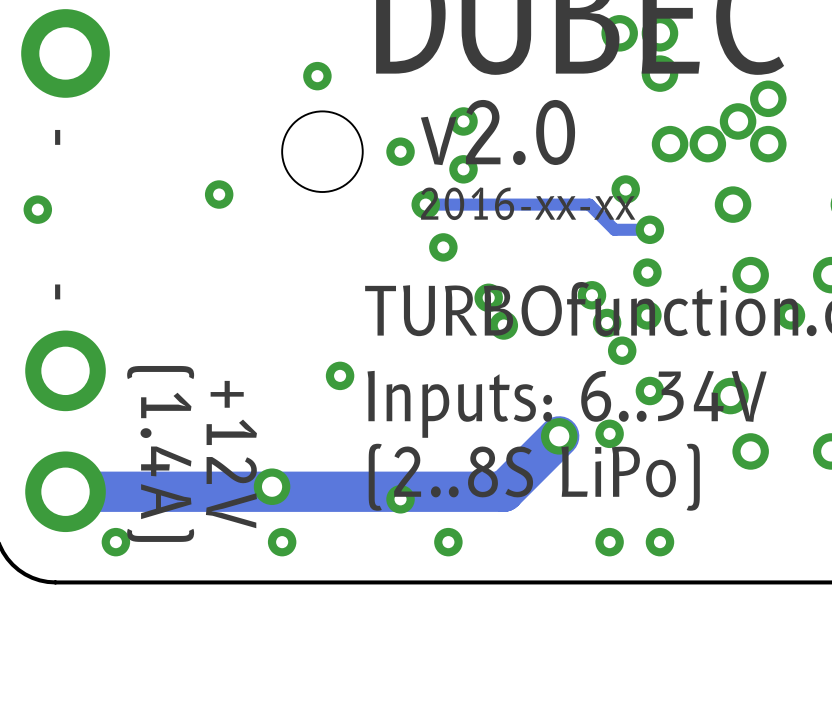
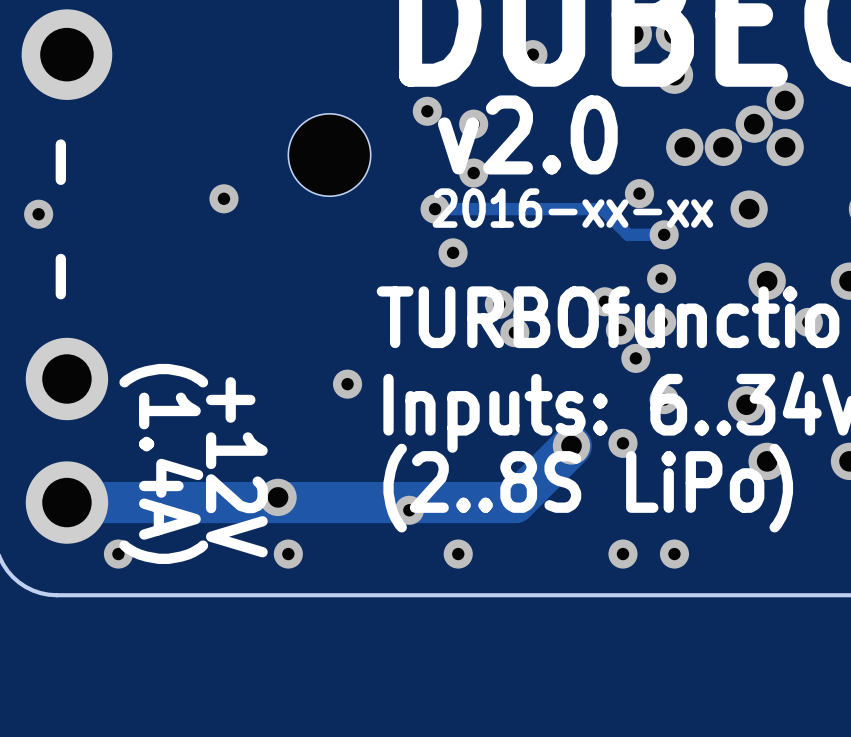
via: none -> (532, 54)
via: (317, 76) -> none
via position: (400, 151) -> (427, 111)

